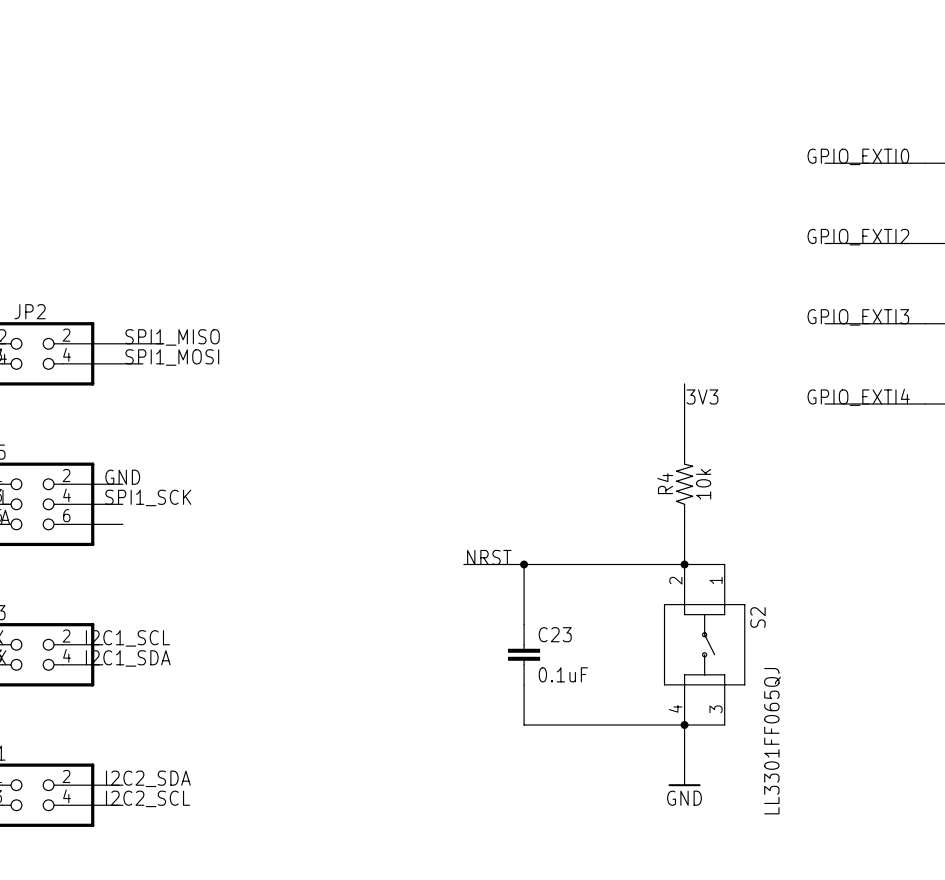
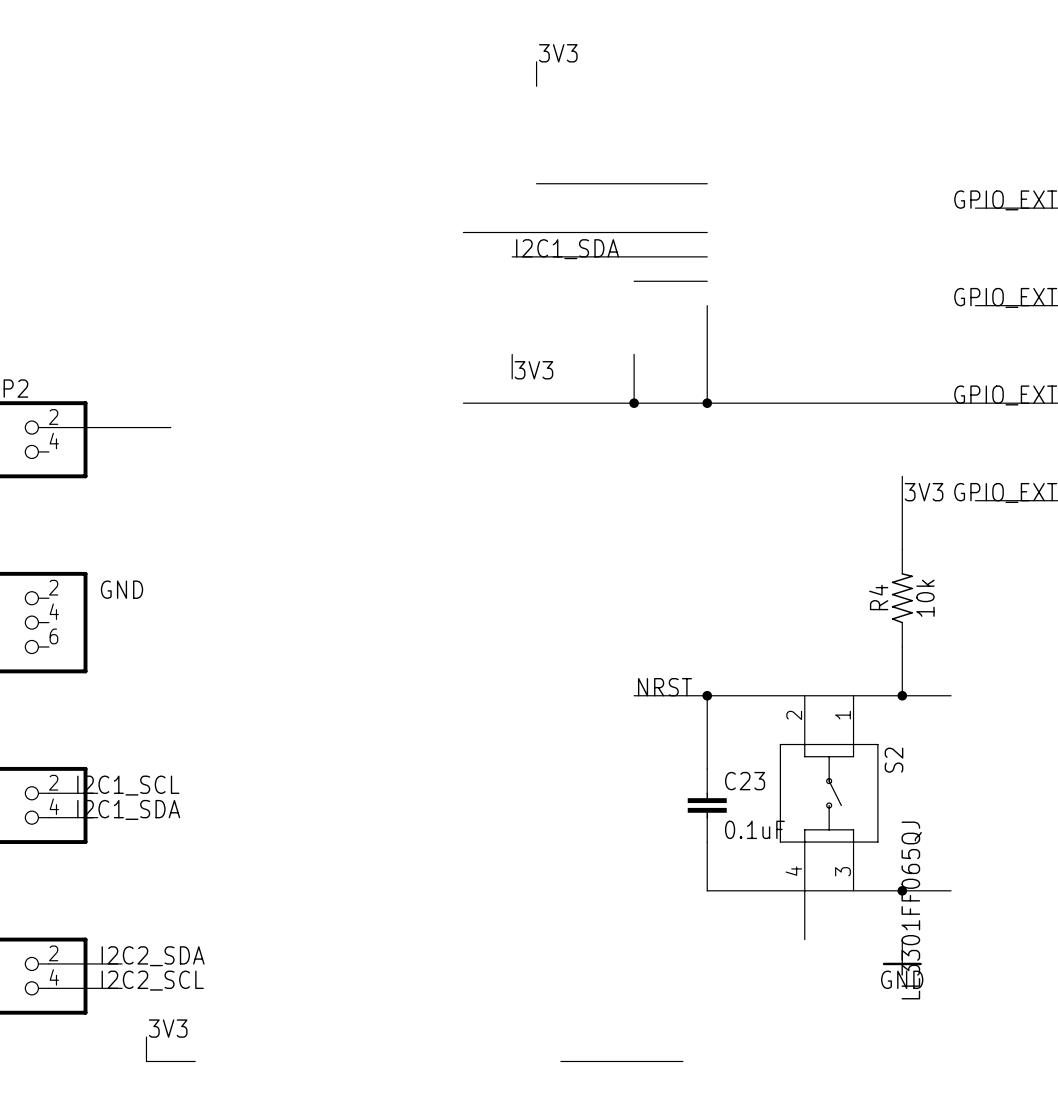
label: none -> 3V3 (558, 53)
wire: none -> (536, 61) (536, 86)
wire: none -> (536, 183) (707, 183)
wire: none -> (463, 232) (707, 232)
label: none -> I2C1_SDA (567, 249)
wire: none -> (512, 256) (707, 256)
wire: none -> (634, 281) (707, 281)
wire: none -> (707, 305) (707, 403)
wire: none -> (512, 354) (512, 378)
wire: none -> (634, 354) (634, 403)
label: none -> 3V3 (533, 370)
wire: none -> (463, 403) (975, 403)
junction: none -> (634, 403)
junction: none -> (707, 403)
label: SPI1_MISO (172, 337) -> none
label: SPI1_MOSI (172, 357) -> none
wire: (62, 363) (142, 363) -> none
wire: (684, 383) (684, 444) -> (902, 476) (902, 549)
label position: 3V3 (702, 396) -> 3V3 (924, 492)
wire: (62, 484) (122, 484) -> none
R4 position: (684, 484) -> (902, 598)
label: SPI1_SCK (148, 497) -> none
wire: (62, 504) (122, 504) -> none
wire: (62, 524) (122, 524) -> none
wire: (684, 524) (684, 564) -> (902, 646) (902, 695)
label position: NRST (489, 557) -> NRST (664, 687)
wire: (463, 564) (544, 564) -> none
wire: (524, 564) (524, 624) -> (707, 695) (707, 768)
junction: (524, 564) -> none
junction: none -> (707, 695)
junction: (684, 564) -> none
wire: none -> (853, 695) (951, 695)
junction: none -> (902, 695)
C23 position: (524, 654) -> (707, 805)
wire: (524, 684) (524, 725) (604, 725) -> (707, 842) (707, 890)
junction: (684, 725) -> none
wire: none -> (853, 890) (951, 890)
junction: none -> (902, 890)
power symbol position: GND (684, 775) -> GND (902, 952)
label: none -> 3V3 (168, 1028)
wire: none -> (146, 1037) (146, 1061) (195, 1061)
wire: none -> (560, 1061) (682, 1061)

